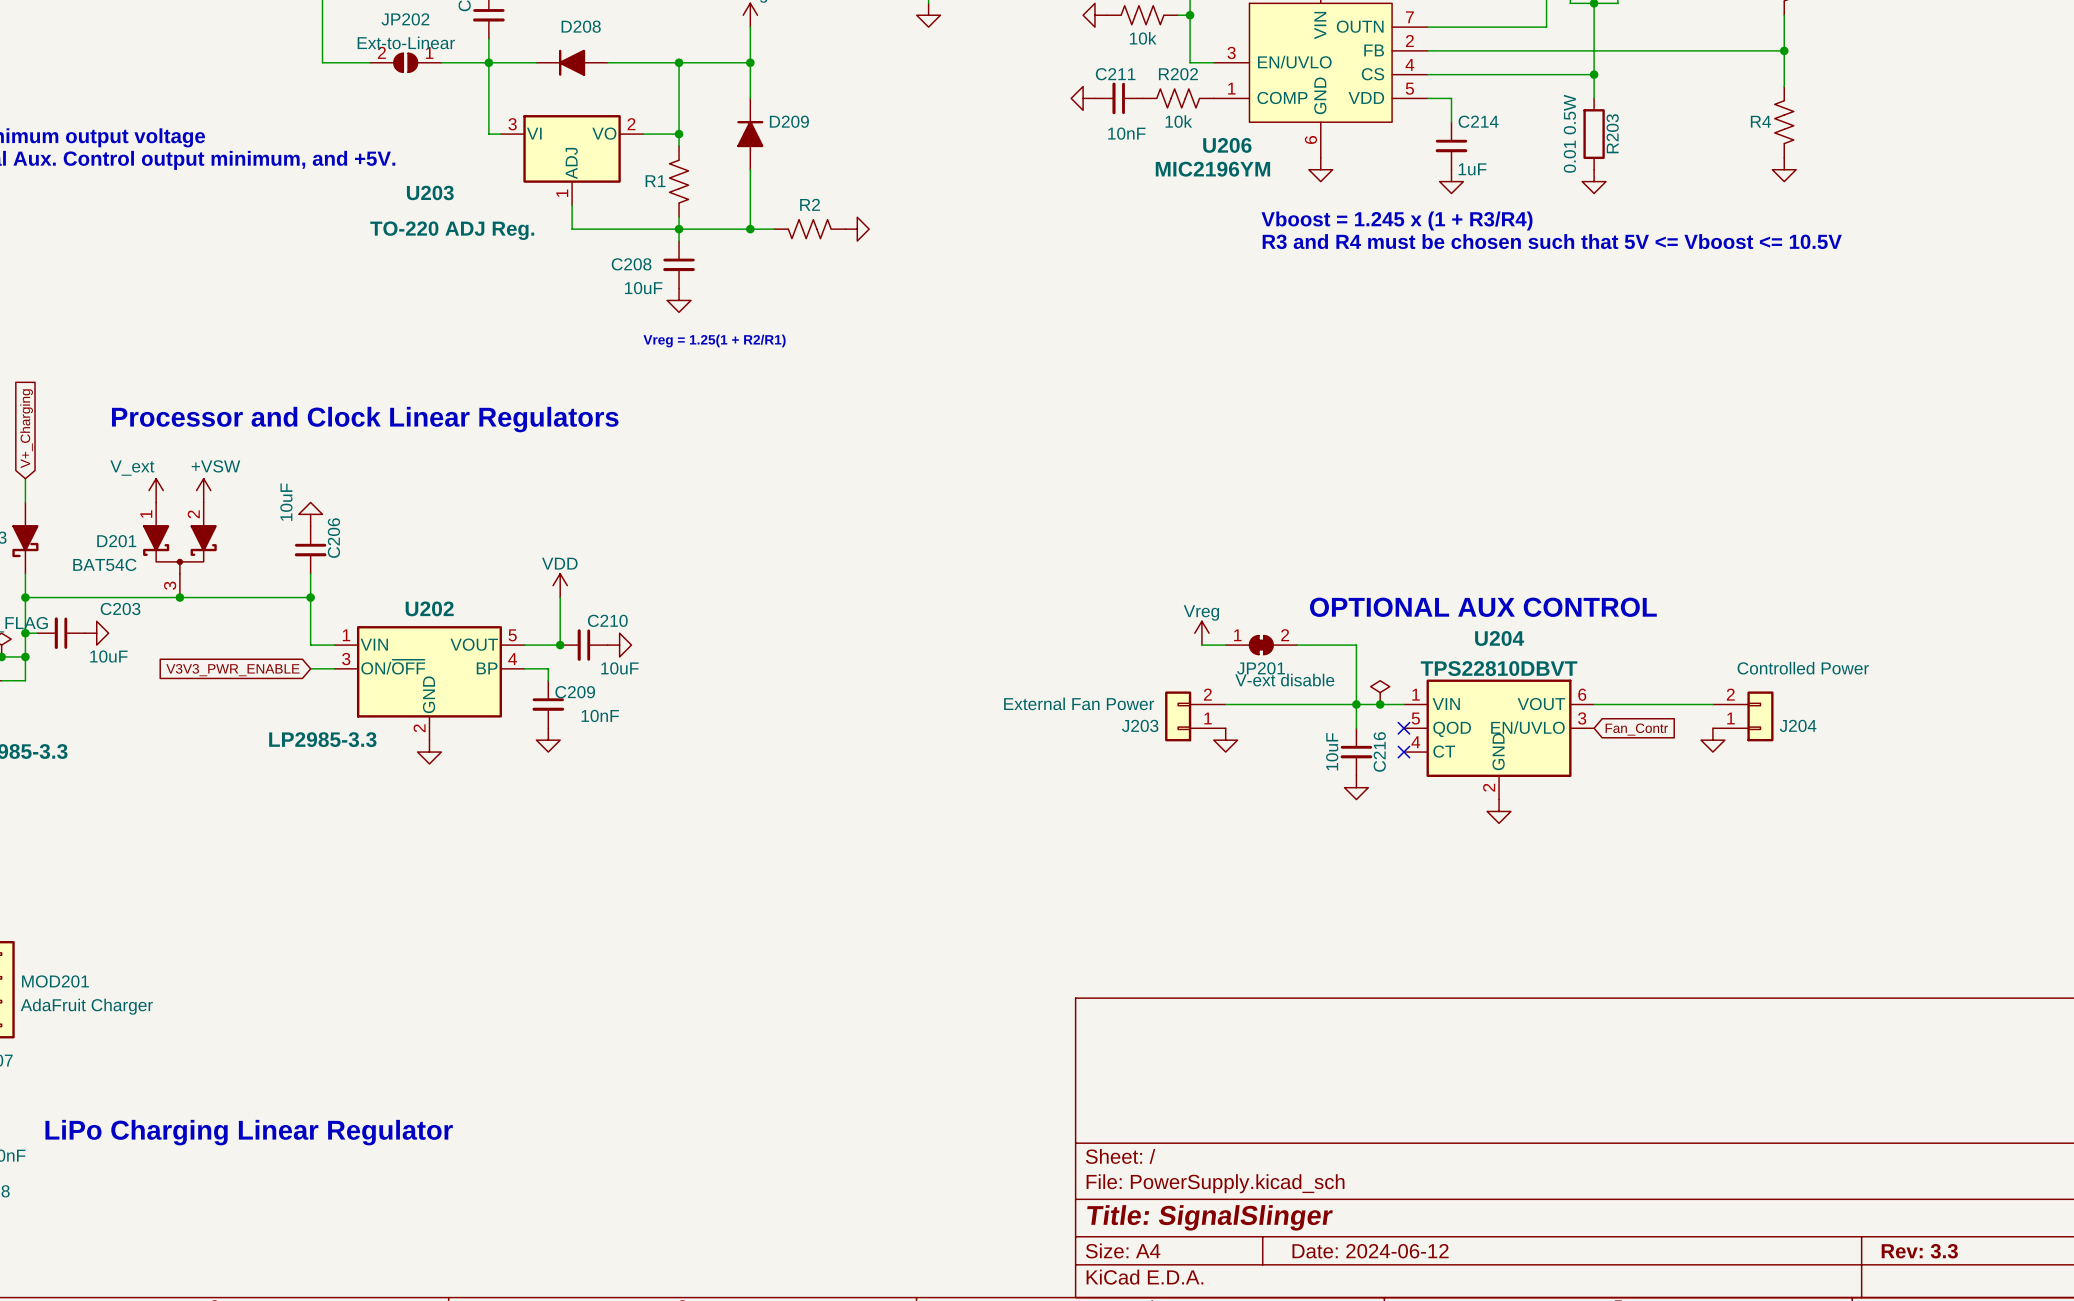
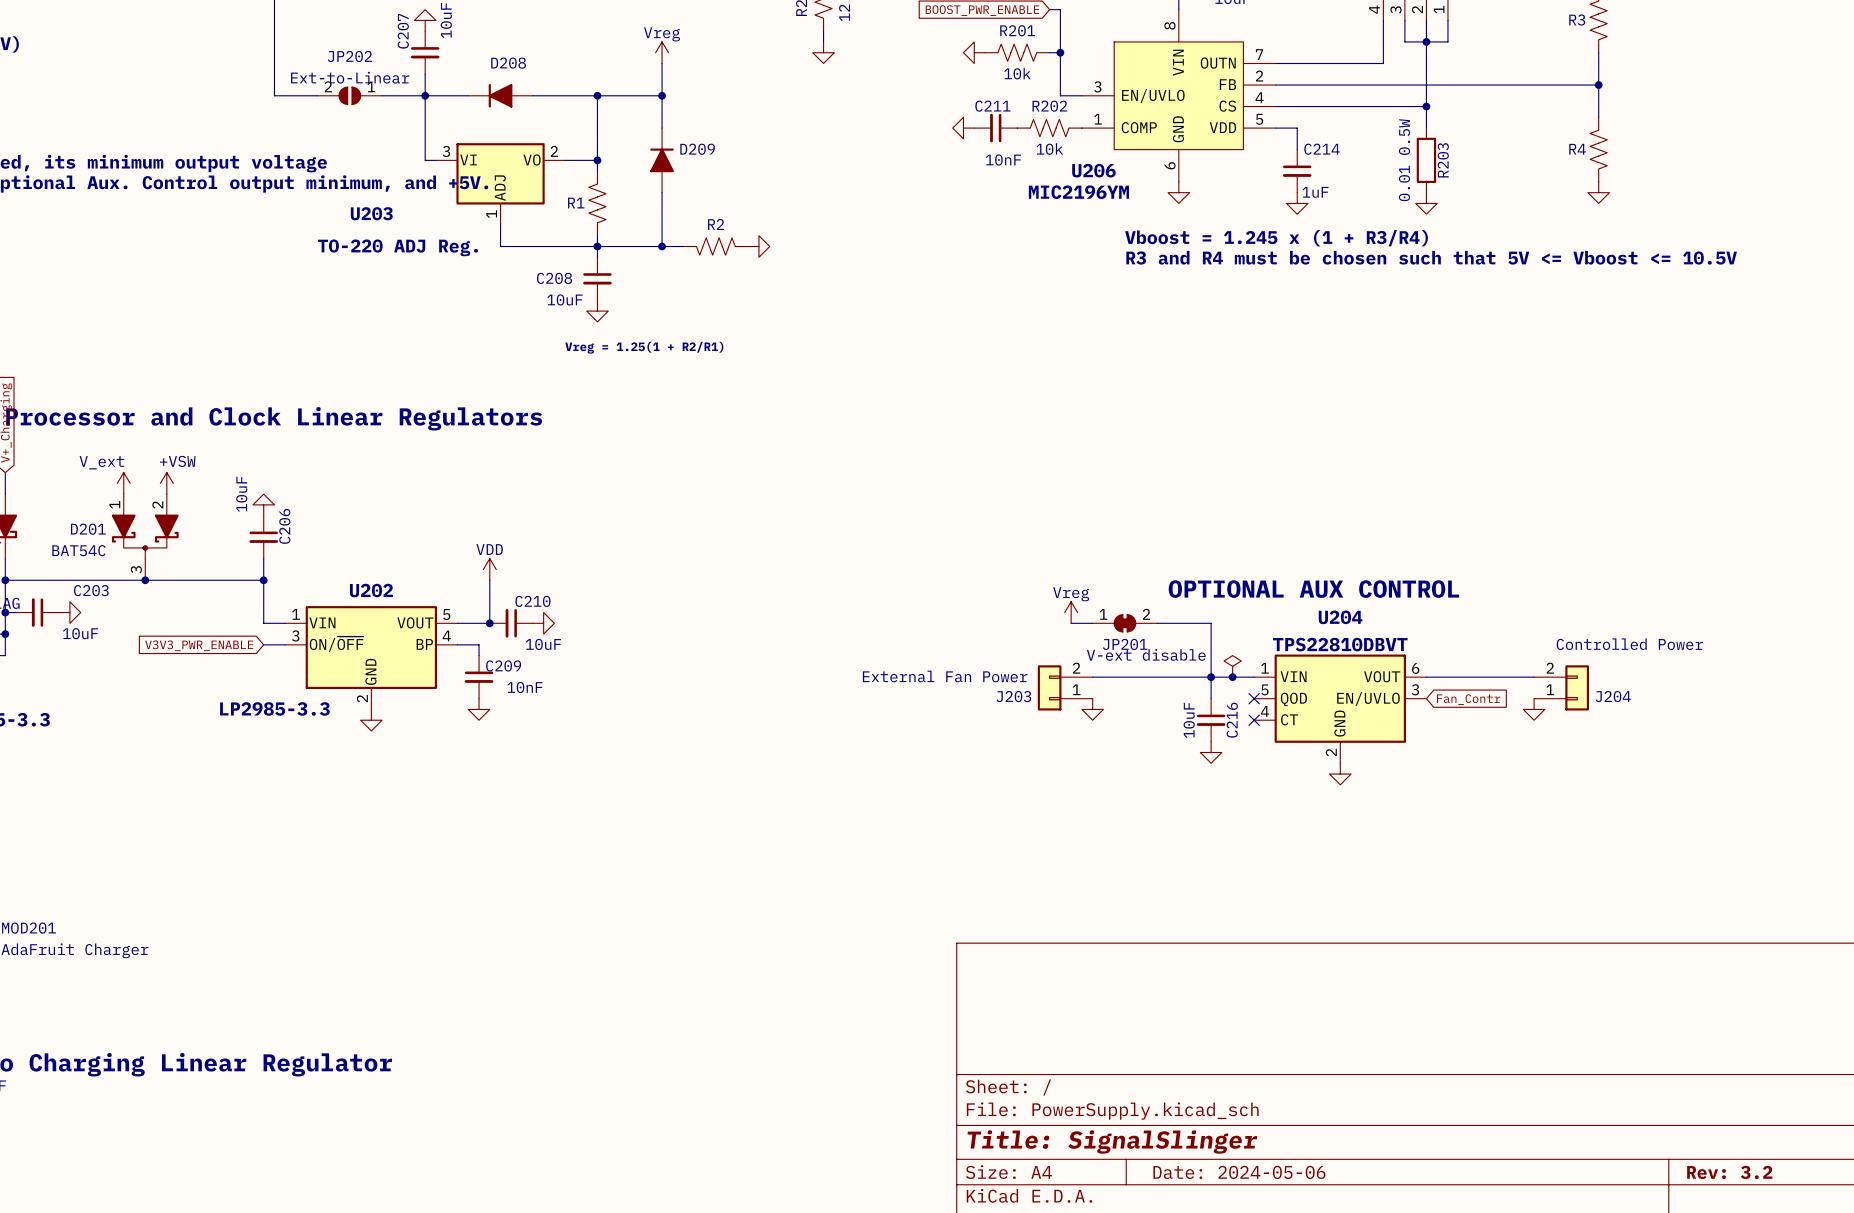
title block: Date: 2024-06-12 (1370, 1251) -> Date: 2024-05-06 (1239, 1172)
title block: Rev: 3.3 (1919, 1251) -> Rev: 3.2 (1729, 1172)

